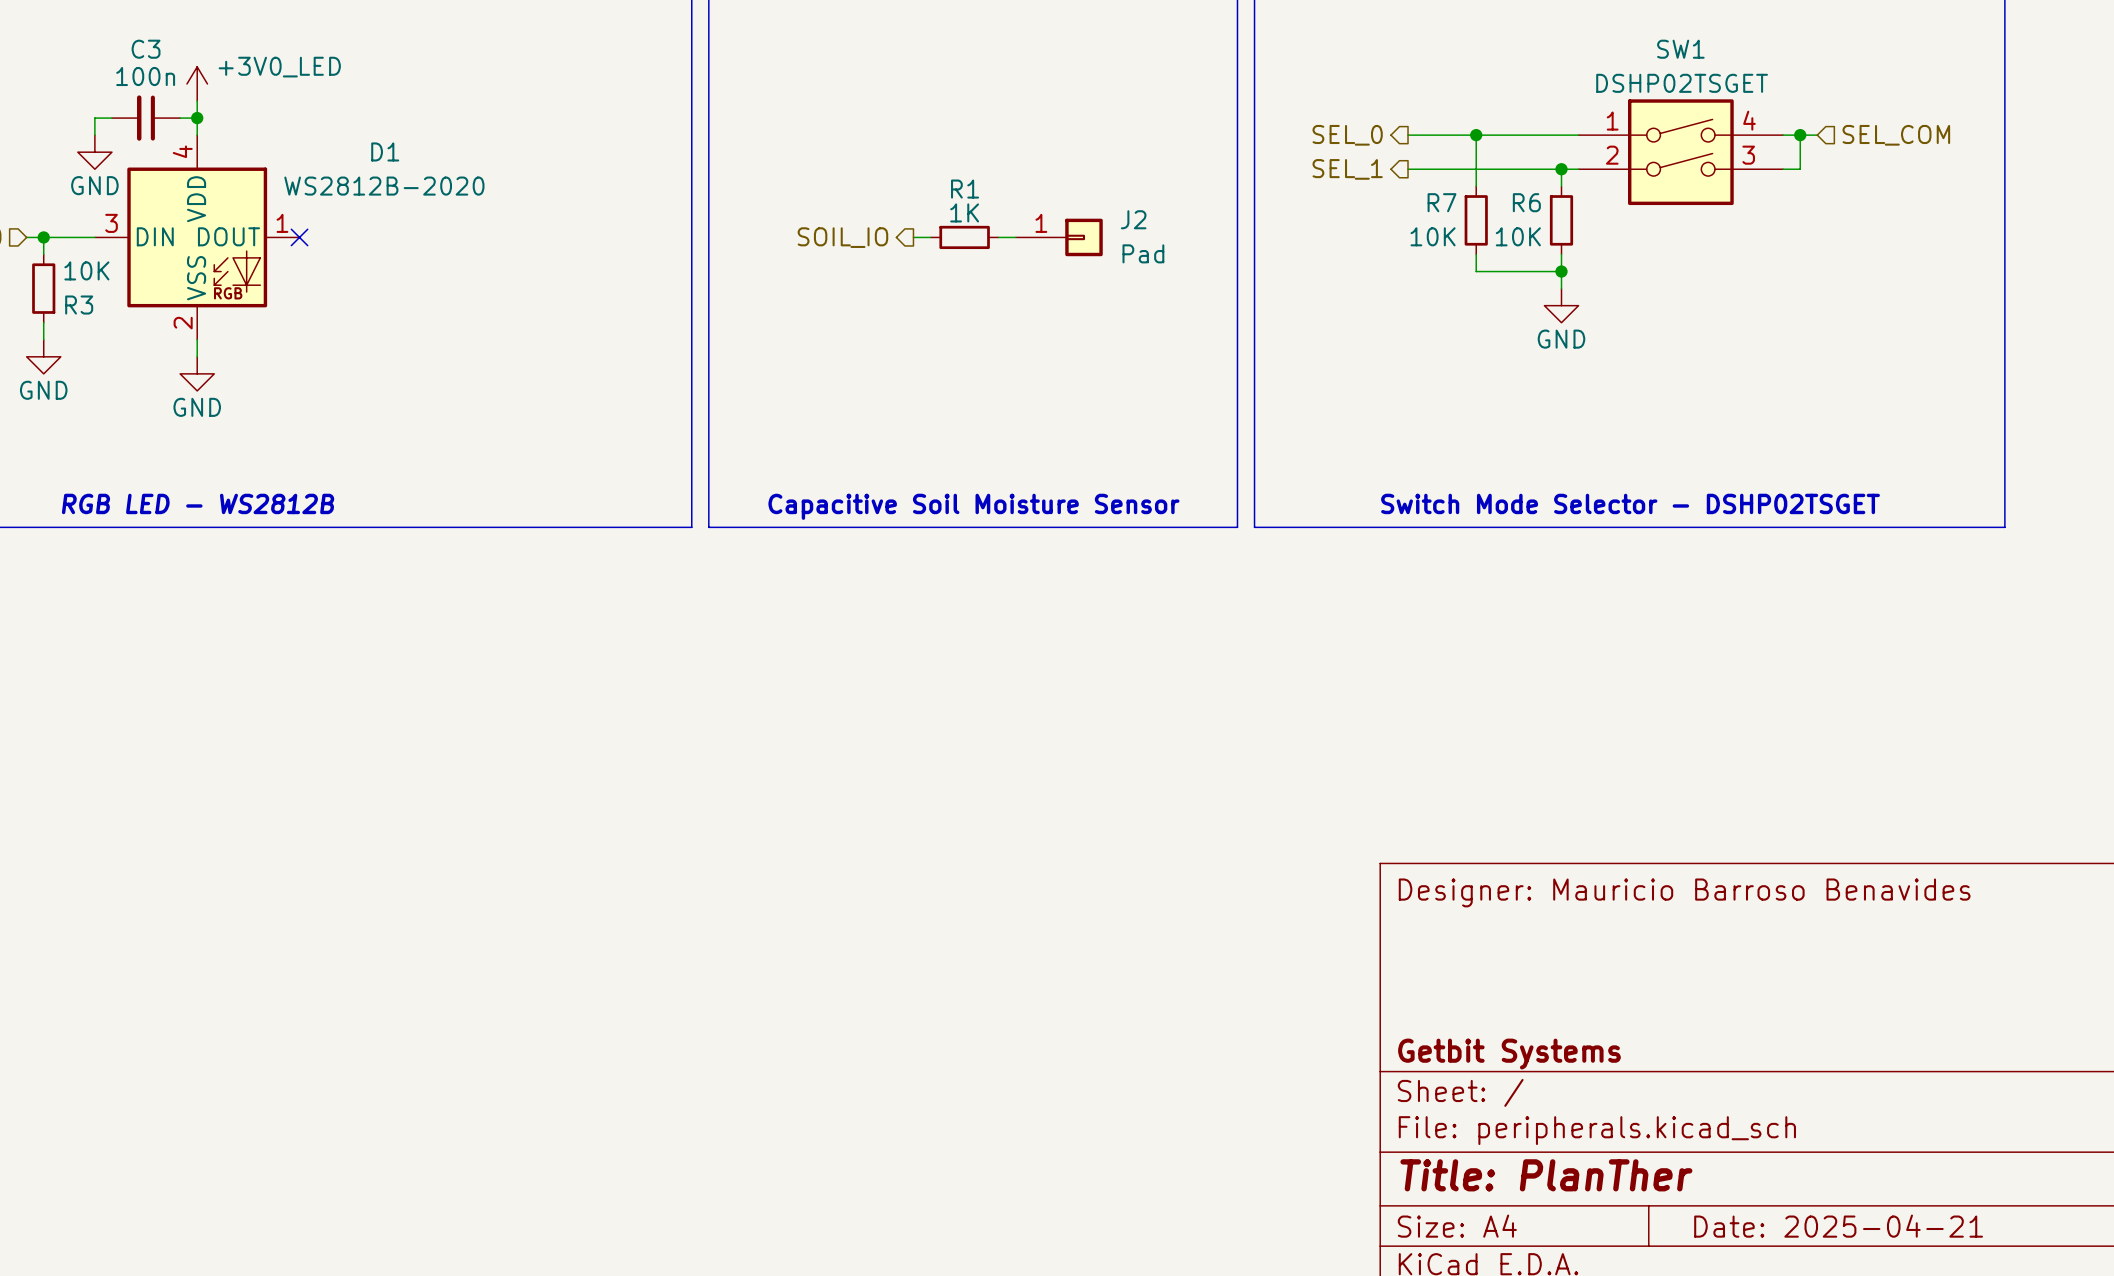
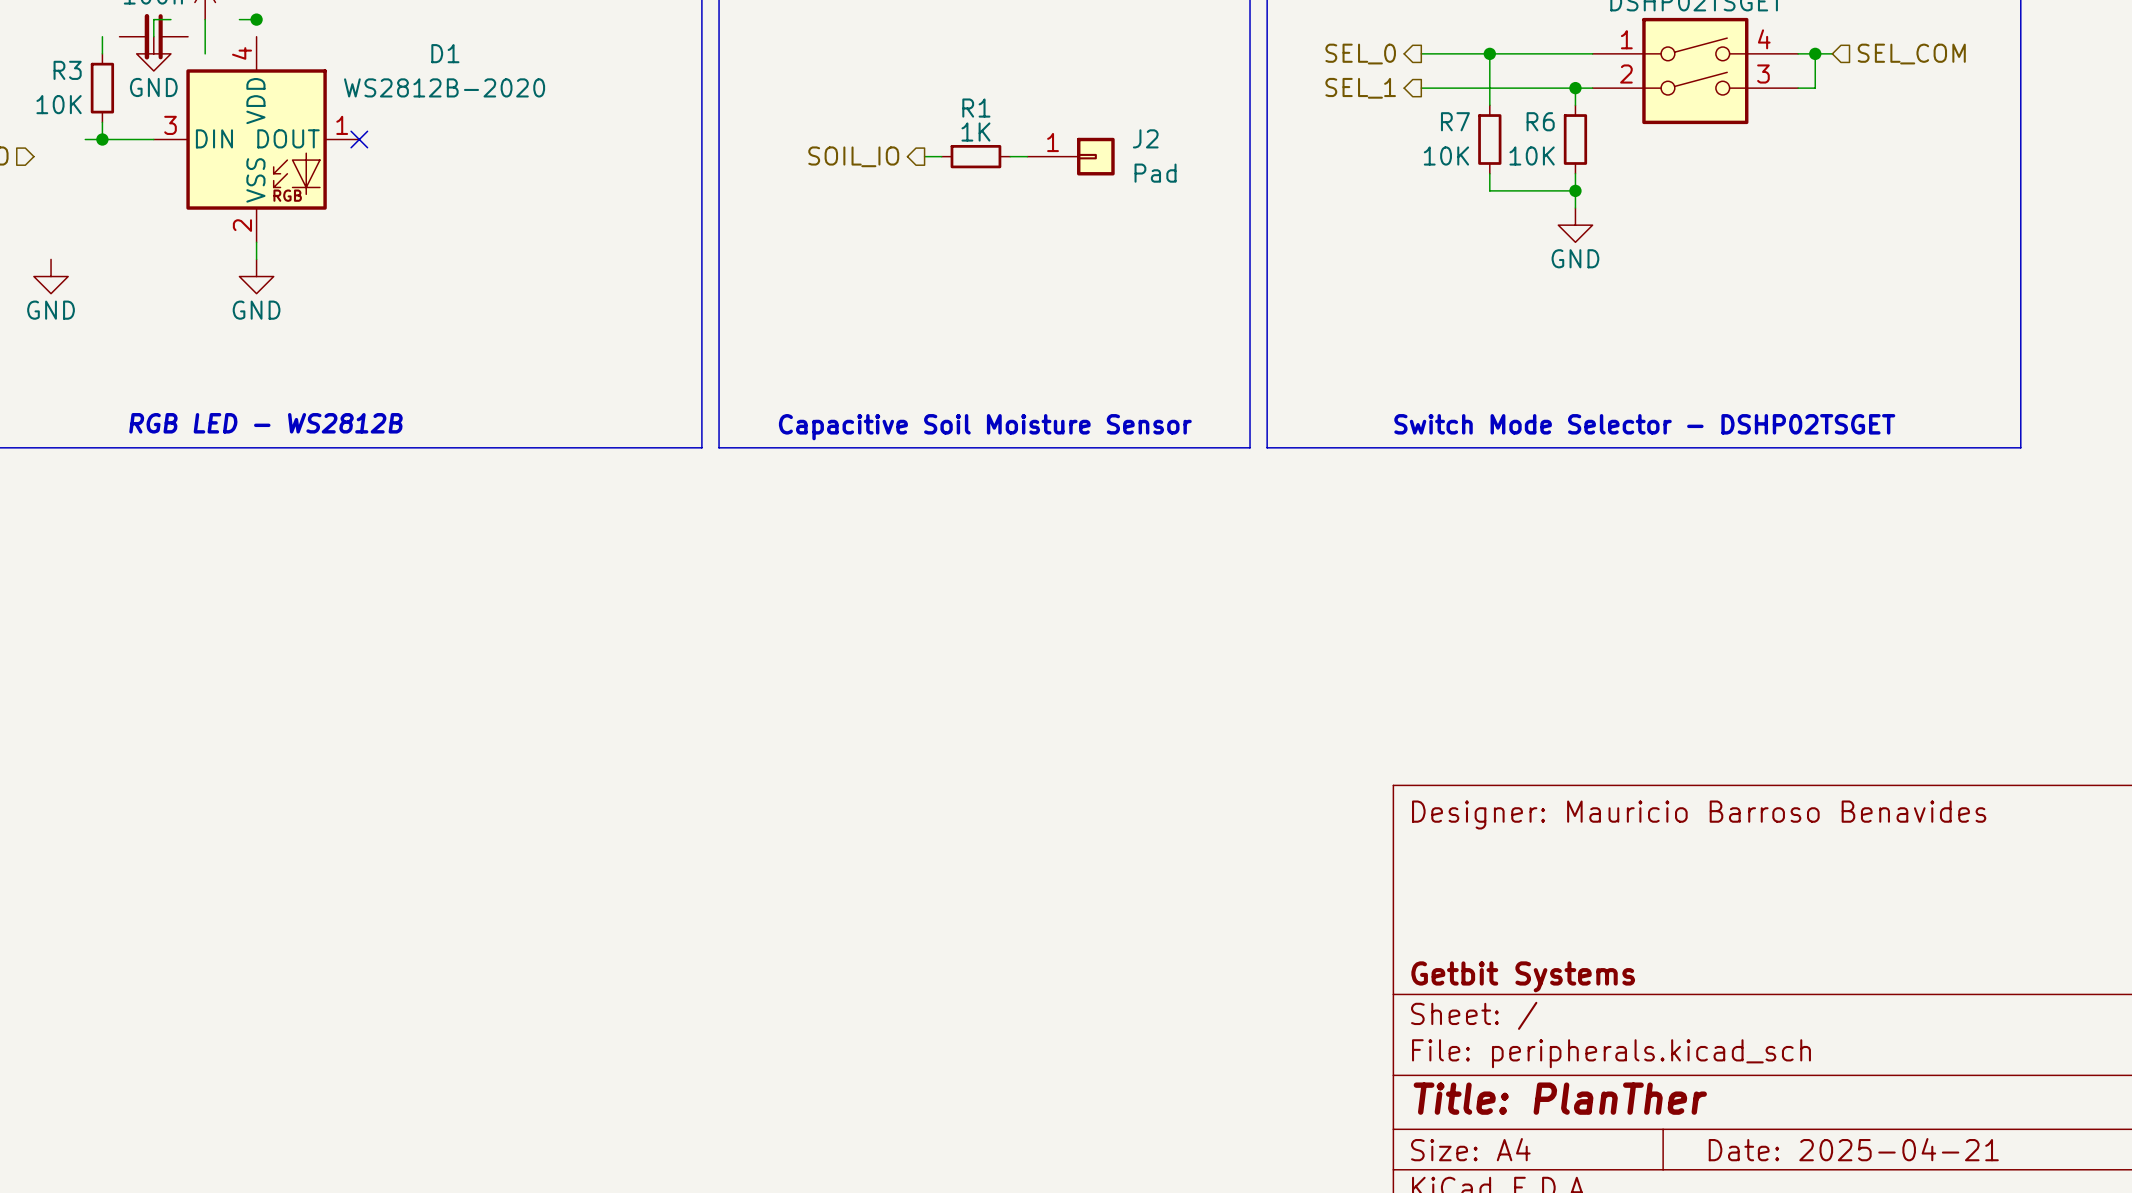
wire: none -> (170, 19) (153, 19) (153, 36)
wire: (94, 118) (111, 118) -> none
wire: (180, 118) (197, 118) -> (239, 19) (256, 19)
junction position: (197, 118) -> (256, 19)
power symbol position: GND (94, 152) -> GND (153, 53)
wire: (26, 237) (94, 237) -> (85, 139) (153, 139)
wire: (43, 237) (43, 254) -> (102, 122) (102, 139)
junction position: (43, 237) -> (102, 139)
D1 position: (197, 237) -> (256, 139)
no-connect mark position: (299, 237) -> (359, 139)
R3 value position: 10K (86, 270) -> 10K (59, 104)
R3 position: (43, 288) -> (102, 88)
R3 name position: R3 (79, 305) -> R3 (67, 70)
wire: (43, 322) (43, 339) -> none
wire: (197, 339) (197, 356) -> (256, 242) (256, 259)
power symbol position: GND (197, 373) -> GND (256, 276)
text position: RGB LED - WS2812B (198, 503) -> RGB LED - WS2812B (266, 423)

